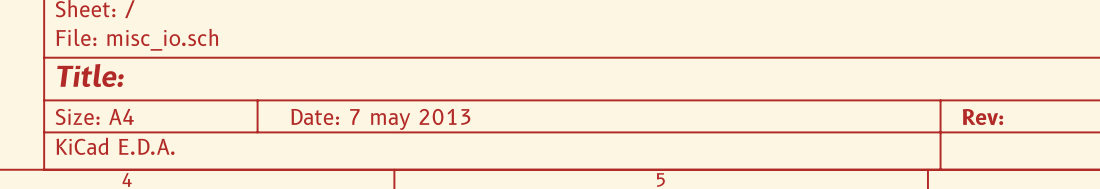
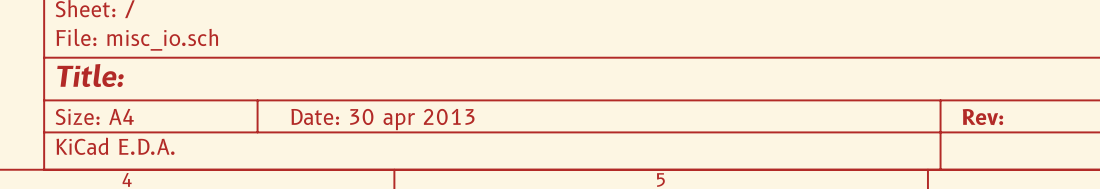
title block: Date: 7 may 2013 (380, 119) -> Date: 30 apr 2013 (382, 119)

